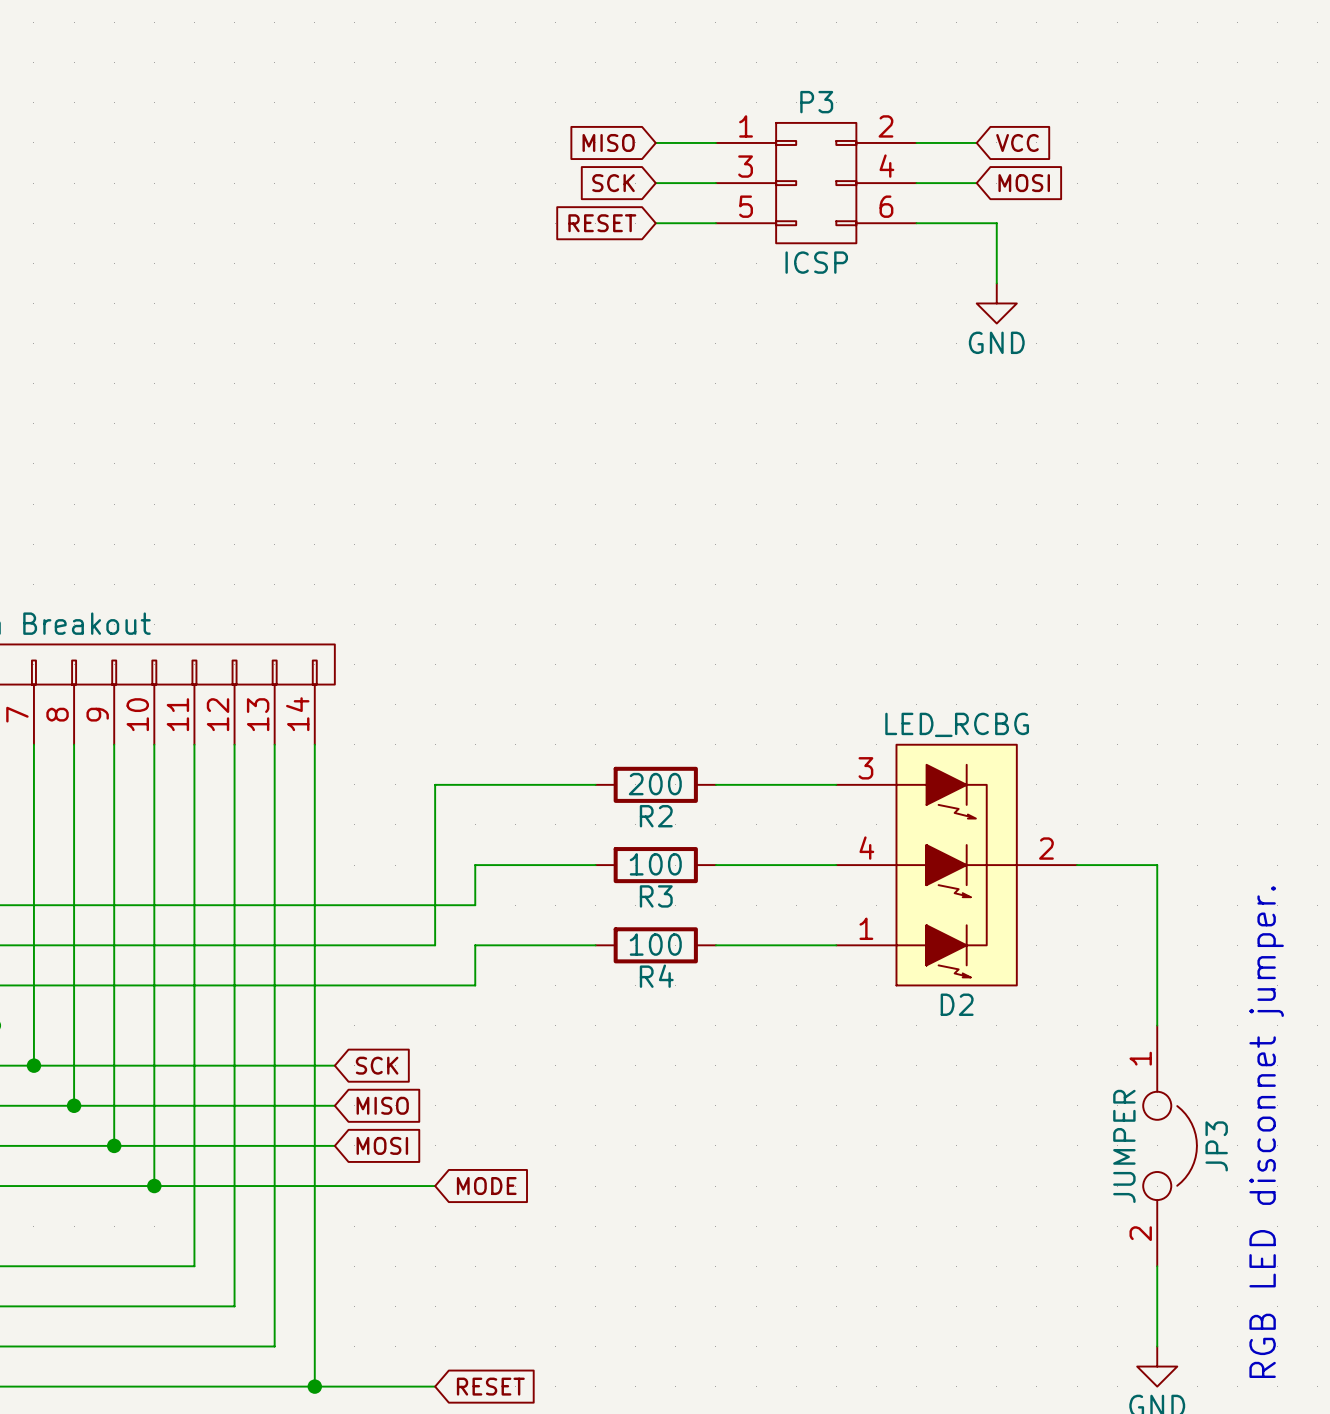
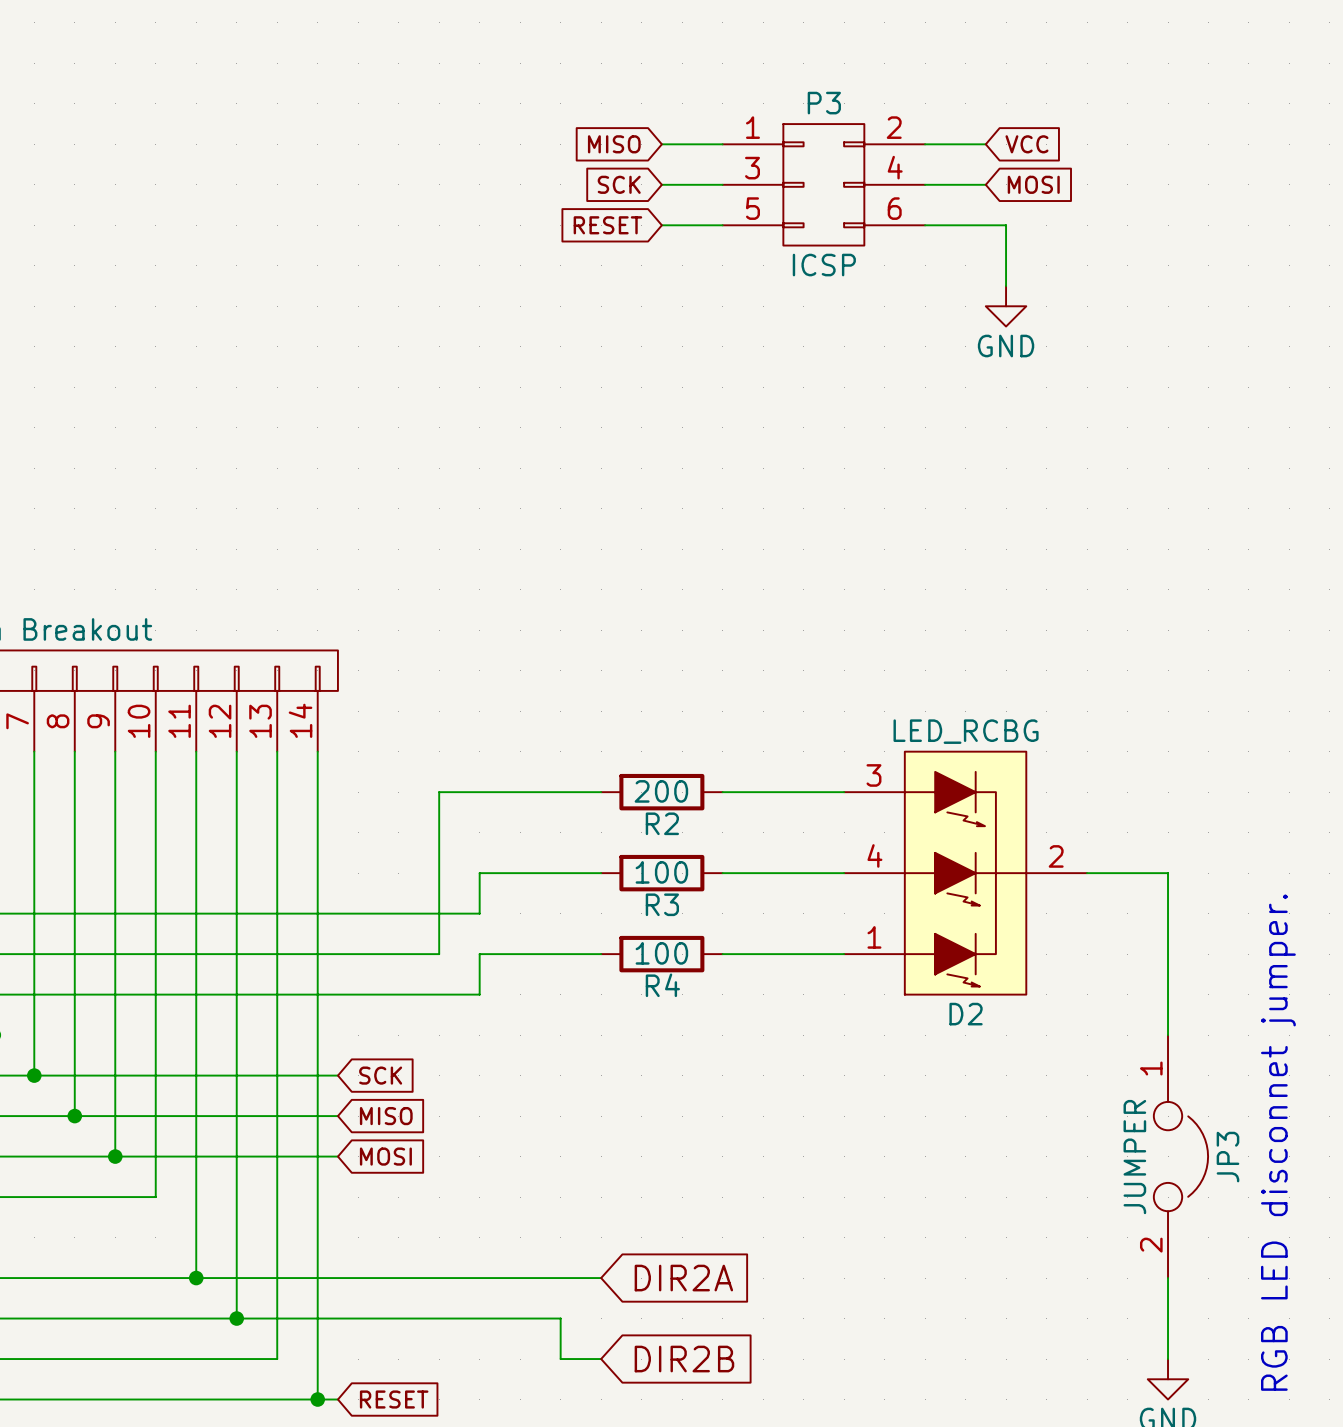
wire: (154, 1186) (435, 1186) -> none
junction: (154, 1186) -> none
global label: MODE (486, 1186) -> none
wire: none -> (196, 1278) (601, 1278)
junction: none -> (196, 1278)
global label: none -> DIR2A (683, 1278)
wire: none -> (236, 1318) (560, 1318) (560, 1359) (601, 1359)
junction: none -> (236, 1318)
global label: none -> DIR2B (684, 1359)
wire: (334, 1386) (435, 1386) -> none
global label position: RESET (490, 1386) -> RESET (394, 1399)

